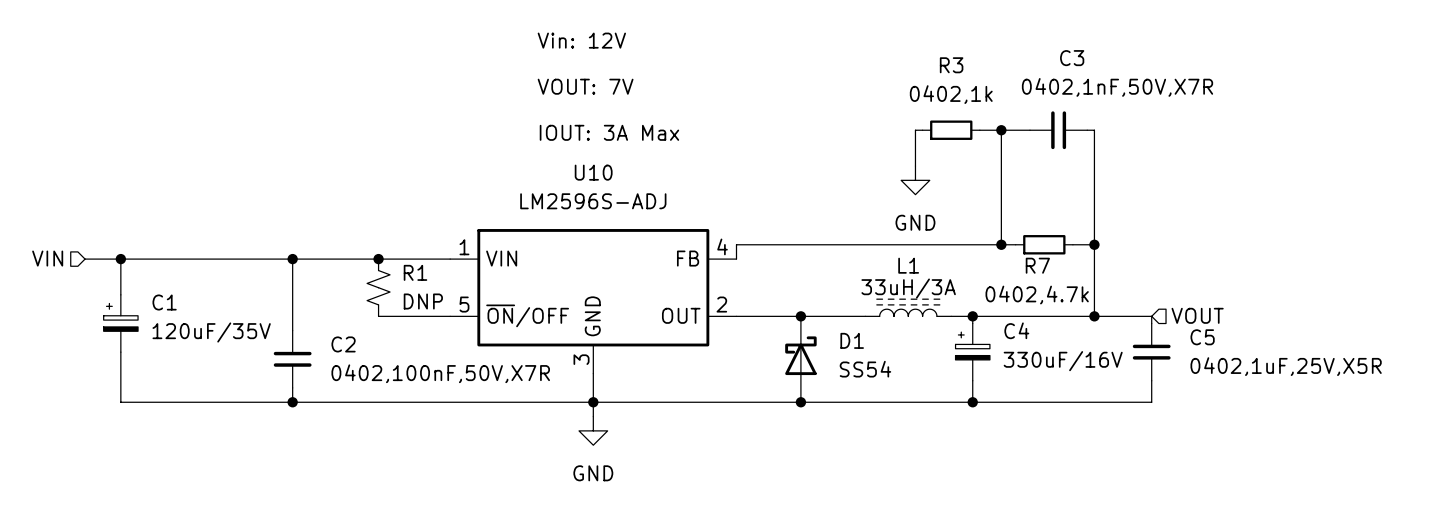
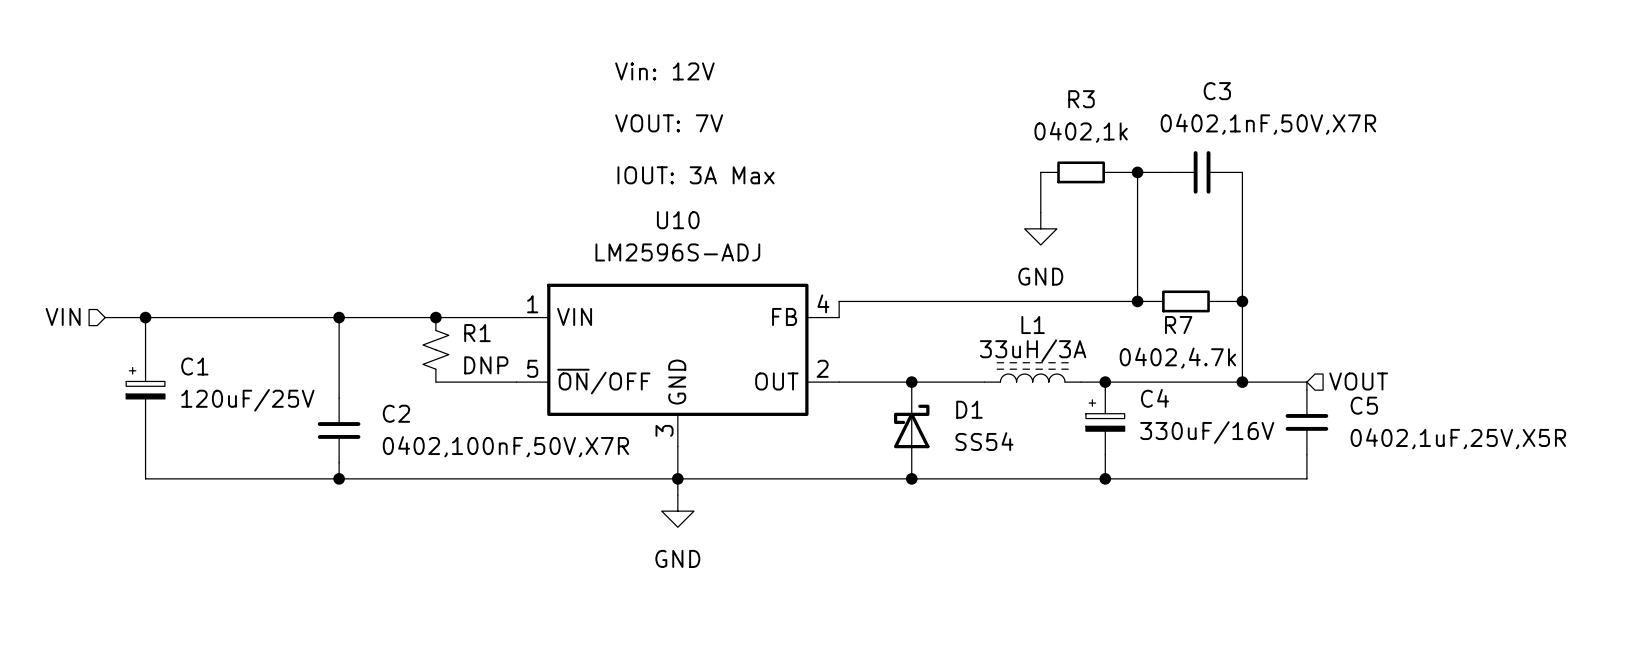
C1 value: 120uF/35V (211, 332) -> 120uF/25V (247, 400)

